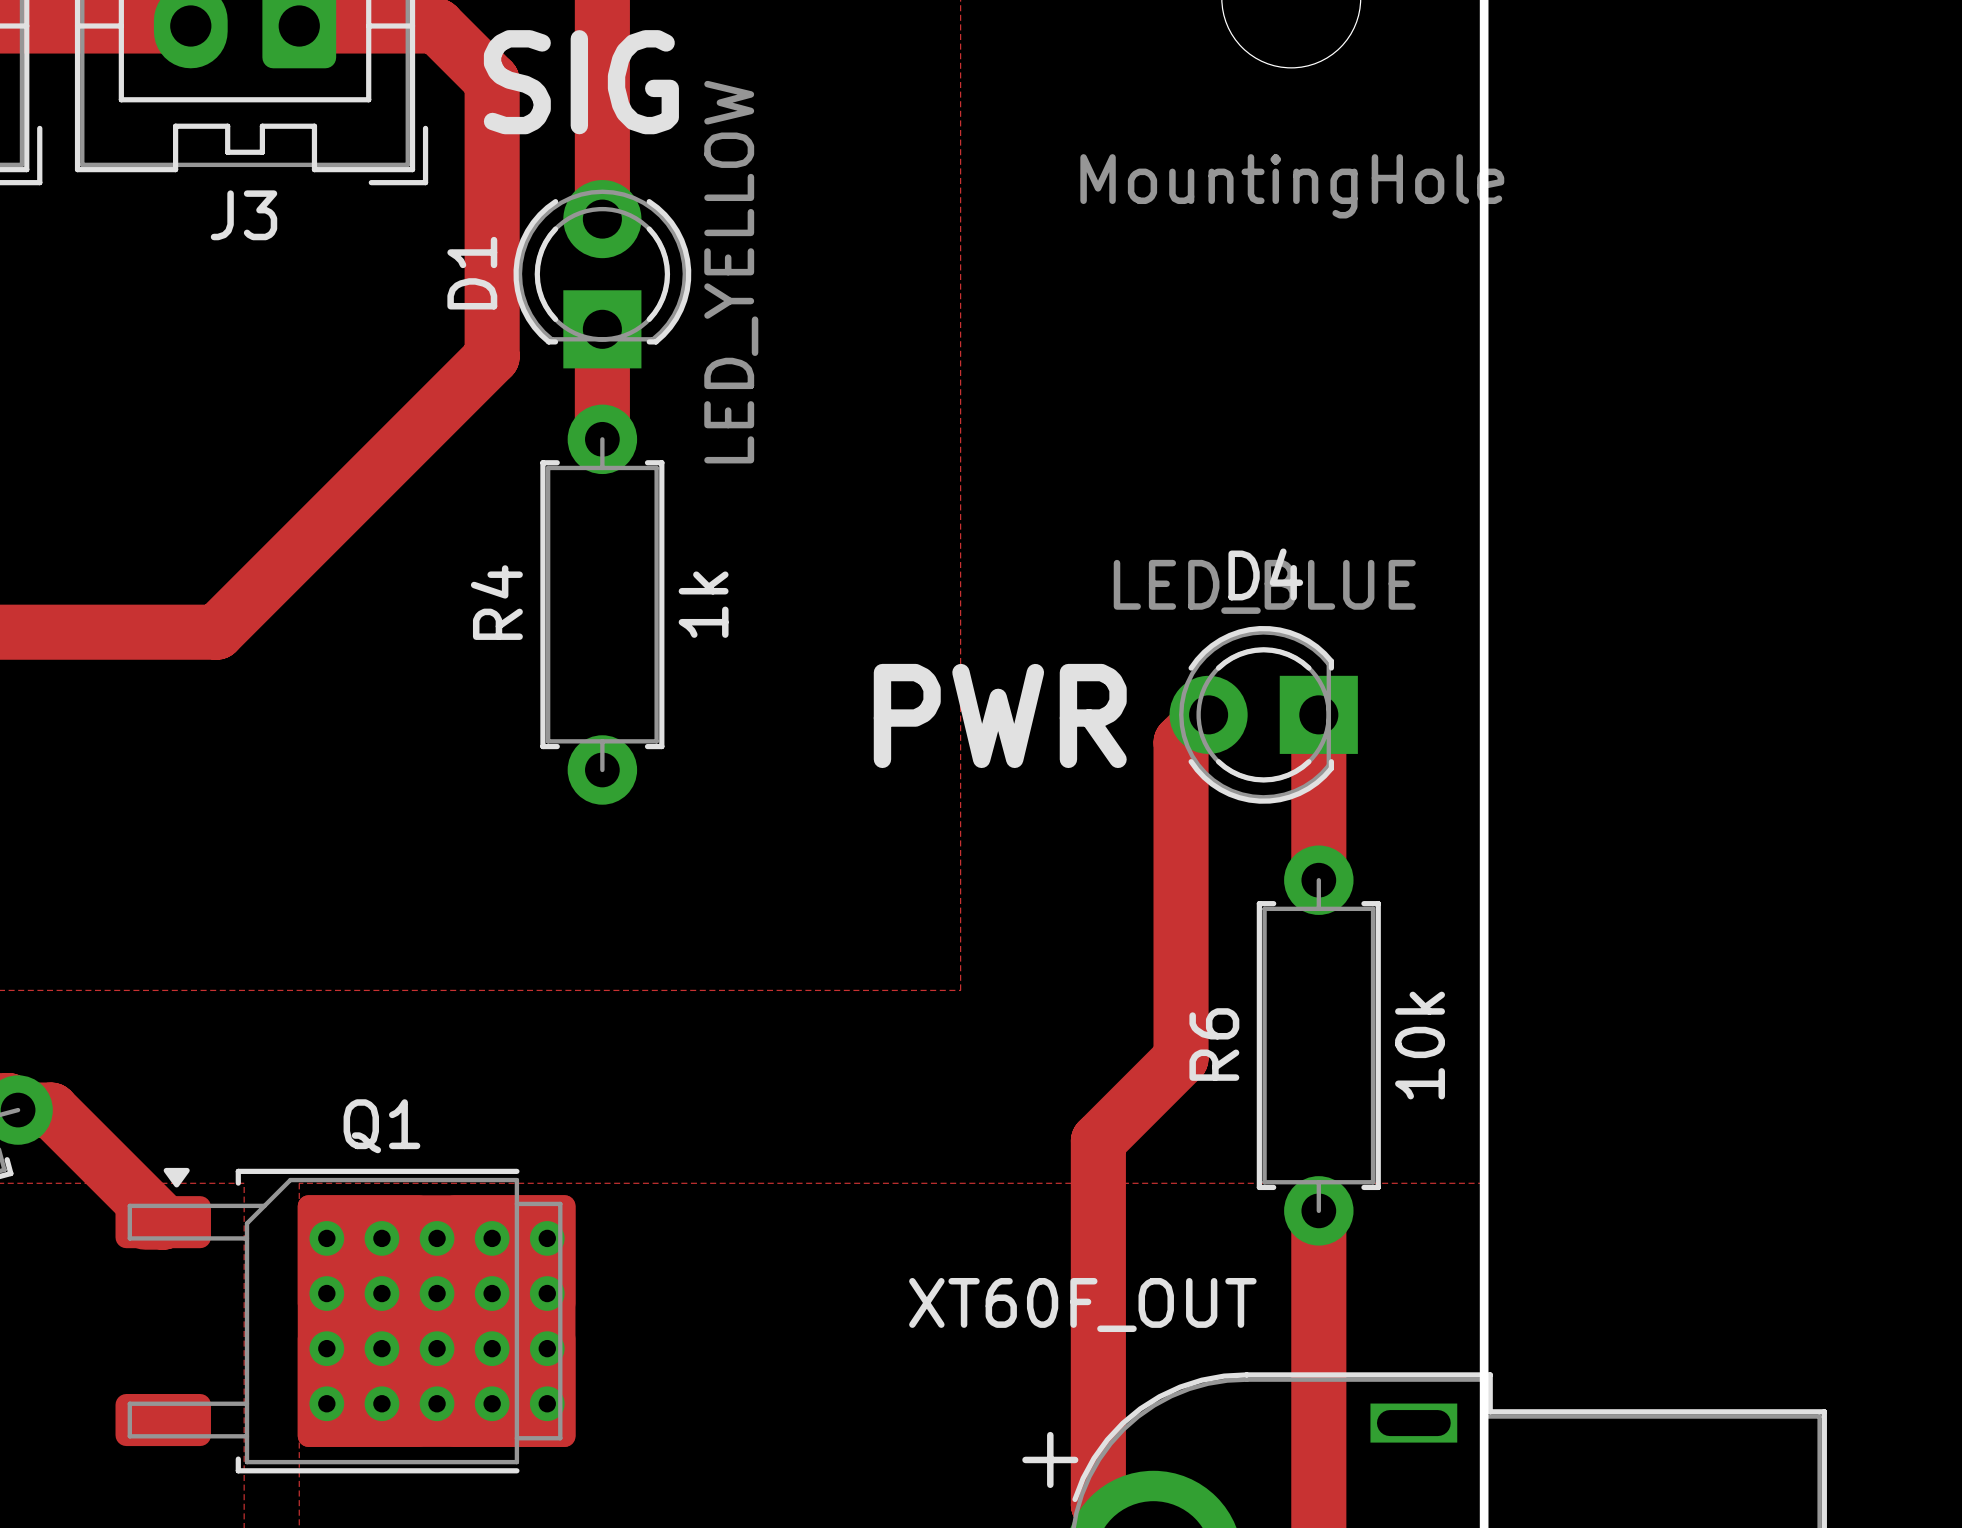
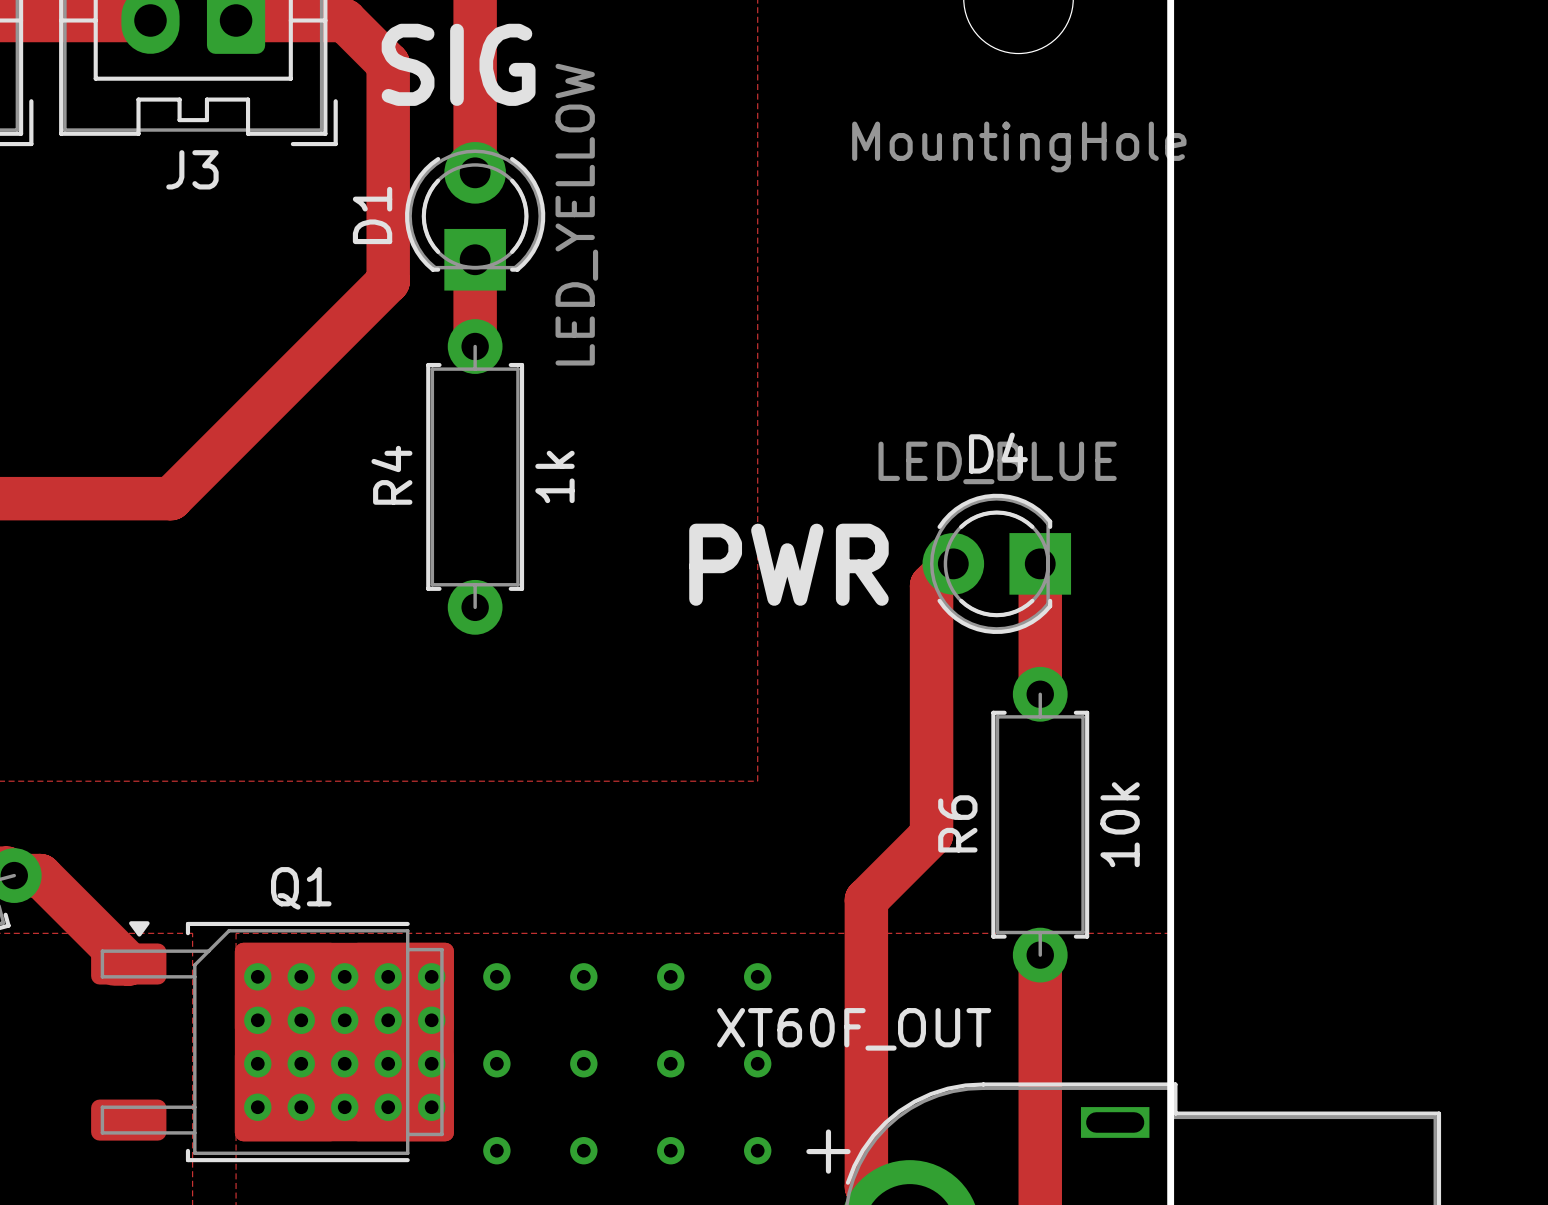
via: none -> (496, 976)
via: none -> (583, 976)
via: none -> (670, 976)
via: none -> (757, 976)
via: none -> (496, 1063)
via: none -> (583, 1063)
via: none -> (670, 1063)
via: none -> (757, 1063)
via: none -> (496, 1150)
via: none -> (583, 1150)
via: none -> (670, 1150)
via: none -> (757, 1150)

